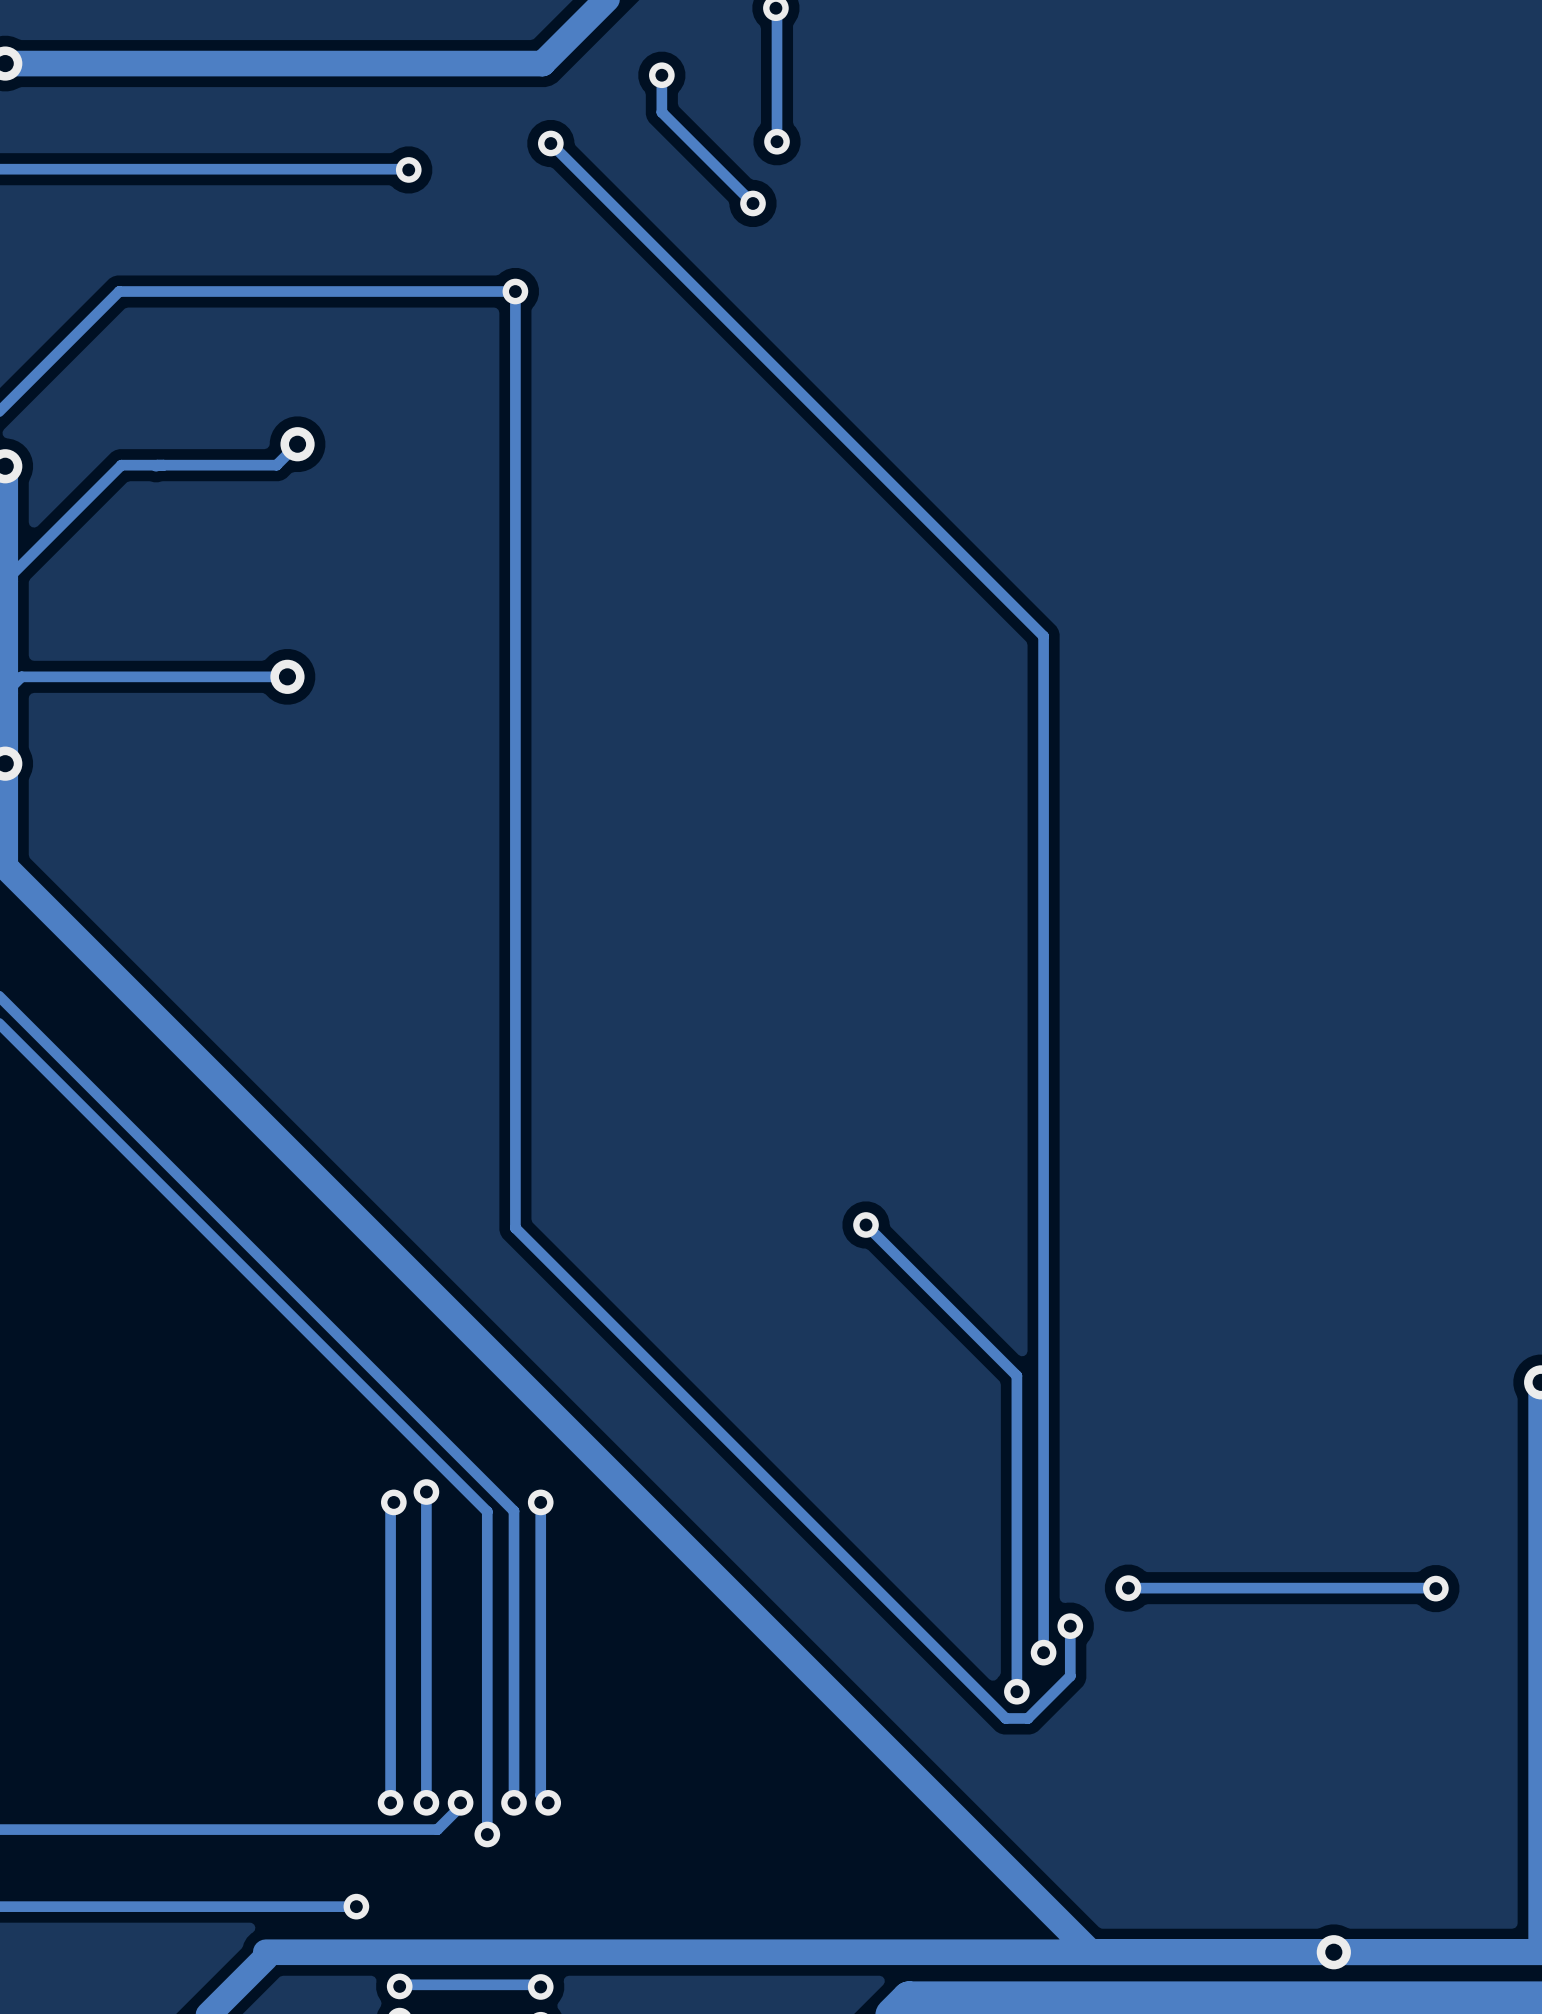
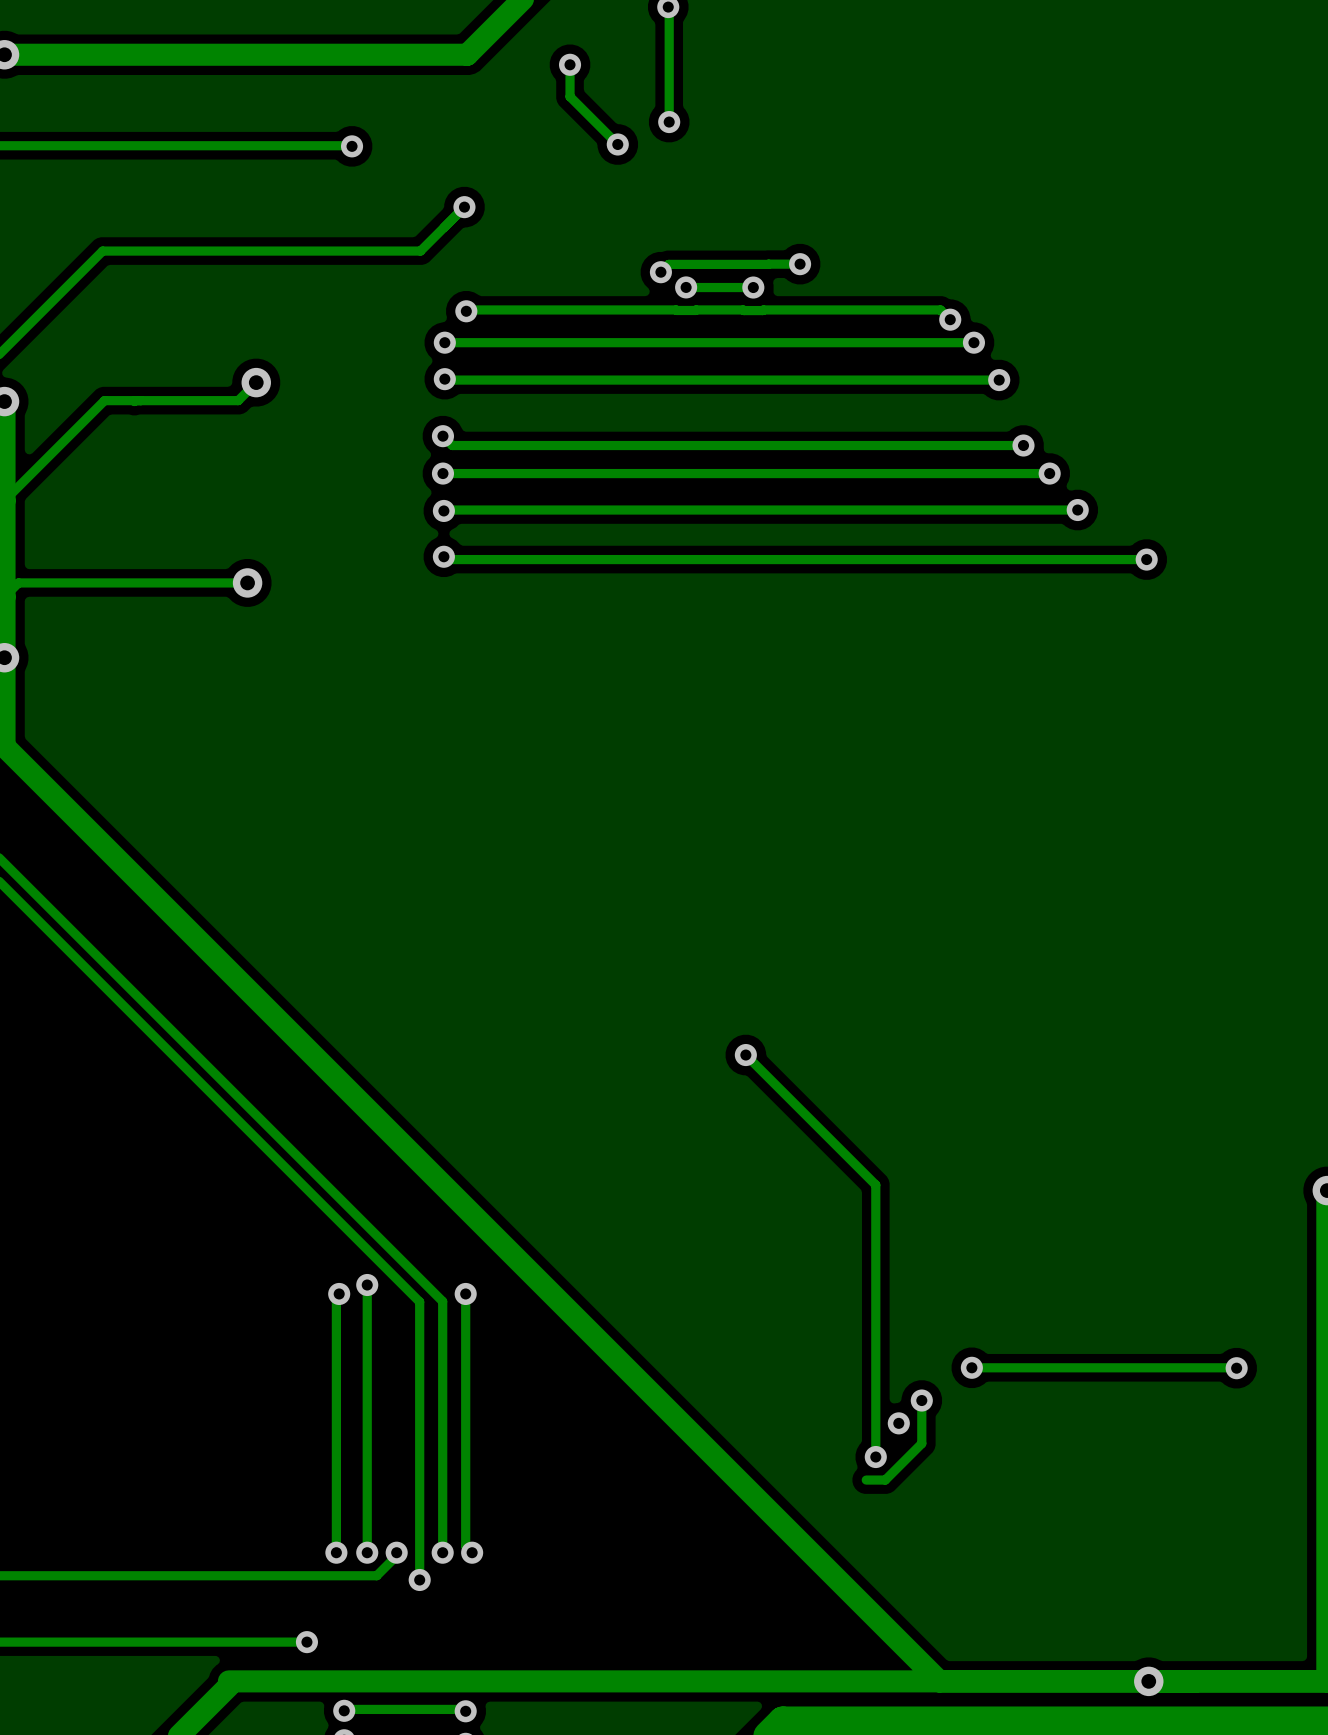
track: (550, 143) (1043, 636) (1043, 1652) -> none
via: (550, 143) -> none
track: (717, 167) (753, 203) -> none
via position: (753, 203) -> (617, 144)
via: none -> (464, 207)
track: (488, 291) (515, 291) (515, 1228) (1005, 1718) -> (420, 251) (464, 207)
via: (515, 291) -> none
track: none -> (768, 264) (668, 264) (660, 272)
track: none -> (800, 264) (768, 264)
via: none -> (800, 264)
via: none -> (660, 272)
via: none -> (686, 287)
track: none -> (753, 287) (686, 287)
via: none -> (753, 287)
track: none -> (676, 309) (466, 311)
track: none -> (696, 309) (940, 309) (950, 319)
track: none -> (695, 310) (676, 310)
via: none -> (466, 311)
via: none -> (950, 319)
via: none -> (444, 342)
track: none -> (973, 342) (444, 342)
via: none -> (973, 342)
track: none -> (444, 379) (999, 380)
via: none -> (444, 379)
via: none -> (999, 380)
track: none -> (442, 436) (452, 445) (1023, 445)
via: none -> (442, 436)
via: none -> (1023, 445)
via: none -> (442, 473)
track: none -> (1049, 473) (442, 473)
via: none -> (1049, 473)
track: none -> (1077, 510) (443, 510)
via: none -> (1077, 510)
via: none -> (443, 510)
track: none -> (443, 556) (446, 559) (1146, 559)
via: none -> (443, 556)
via: none -> (1146, 559)

